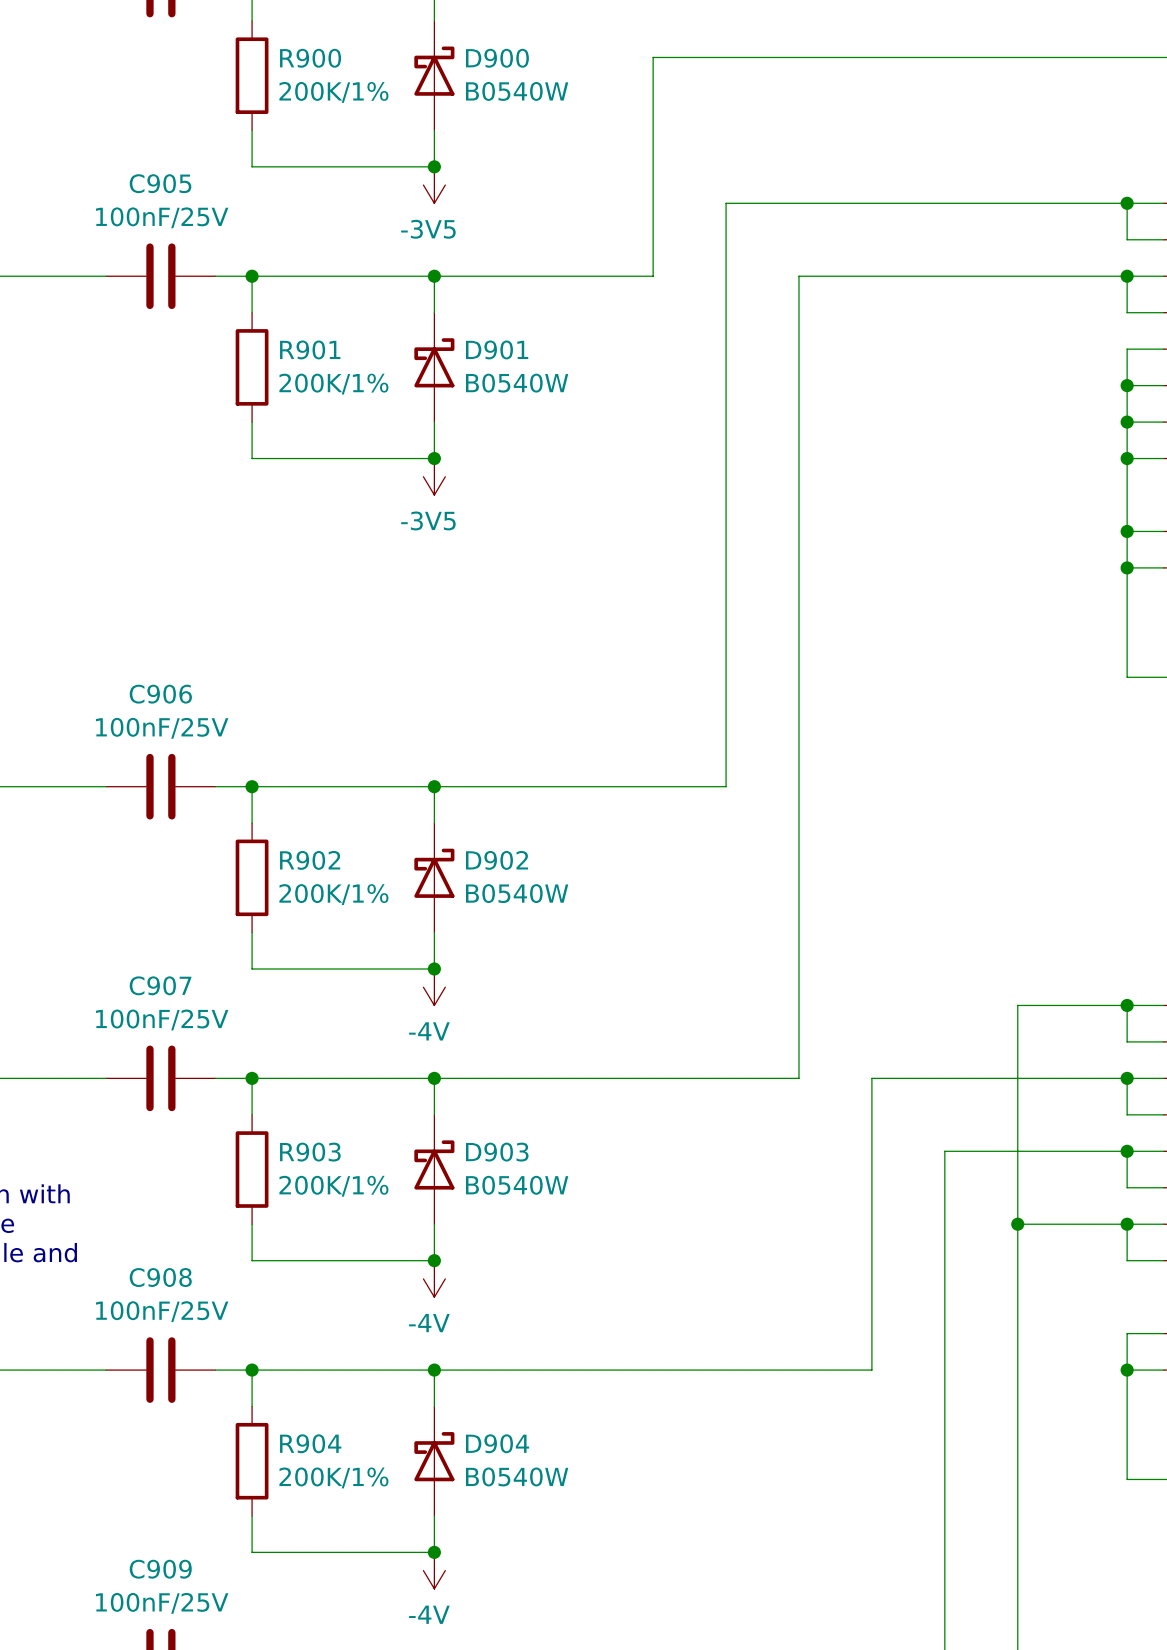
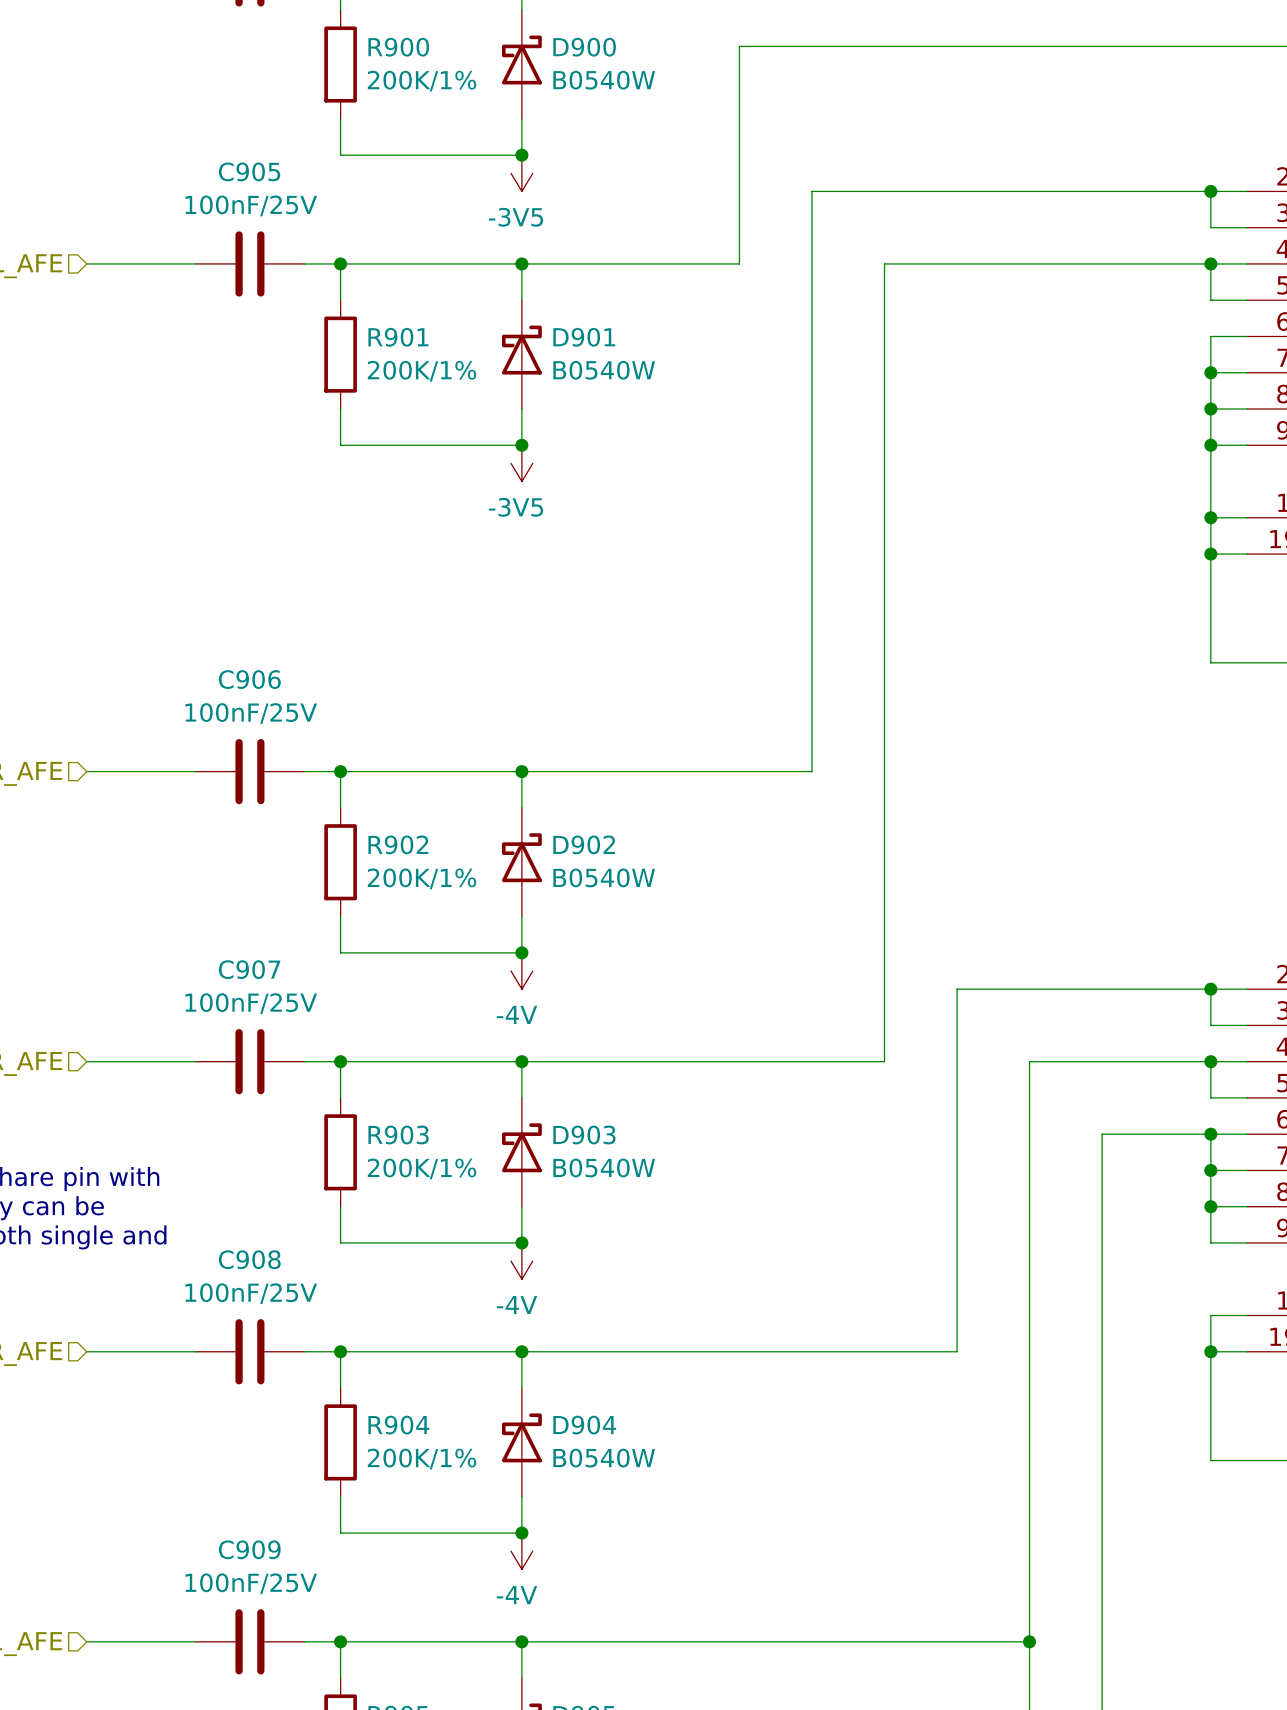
wire: (1017, 1005) (1017, 1151) (944, 1151) -> (1102, 989) (957, 989) (957, 1061)
wire: (871, 1078) (944, 1078) -> (1029, 1134) (1029, 1061)
junction: none -> (1210, 1170)
wire: (1017, 1224) (1127, 1224) -> (1210, 1170) (1210, 1206)
junction: (1017, 1224) -> none

